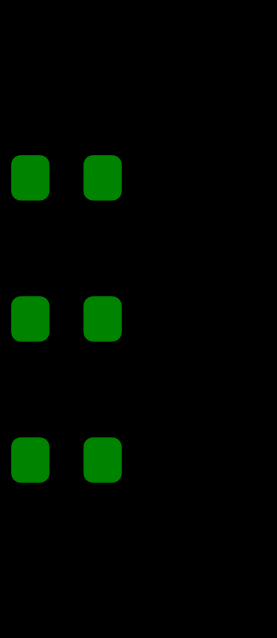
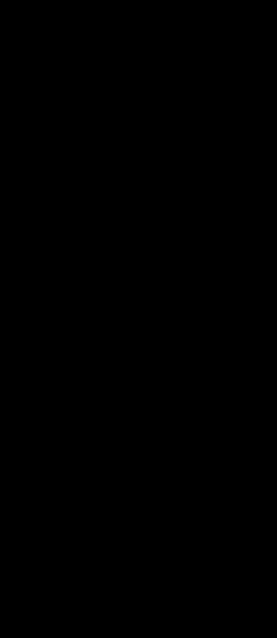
part: (66, 177) -> none
part: (66, 318) -> none
part: (66, 460) -> none

